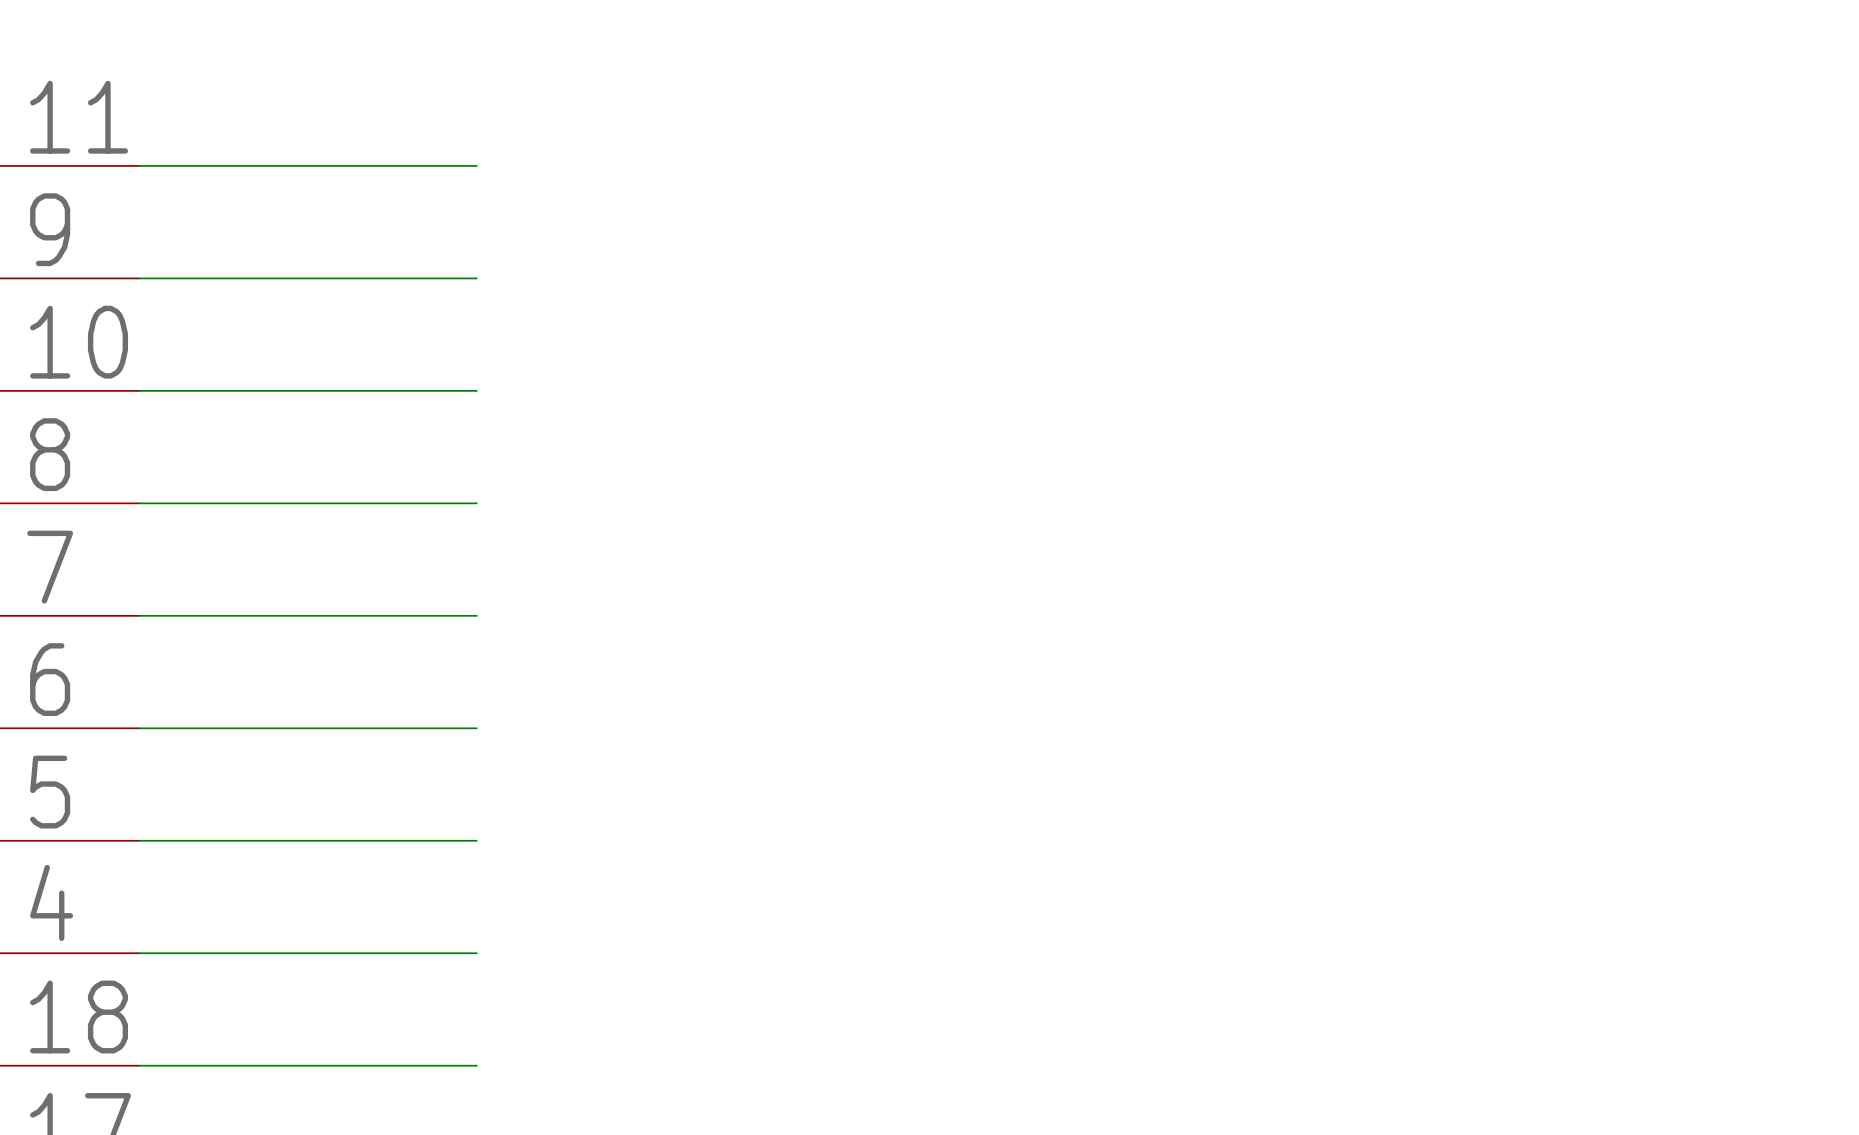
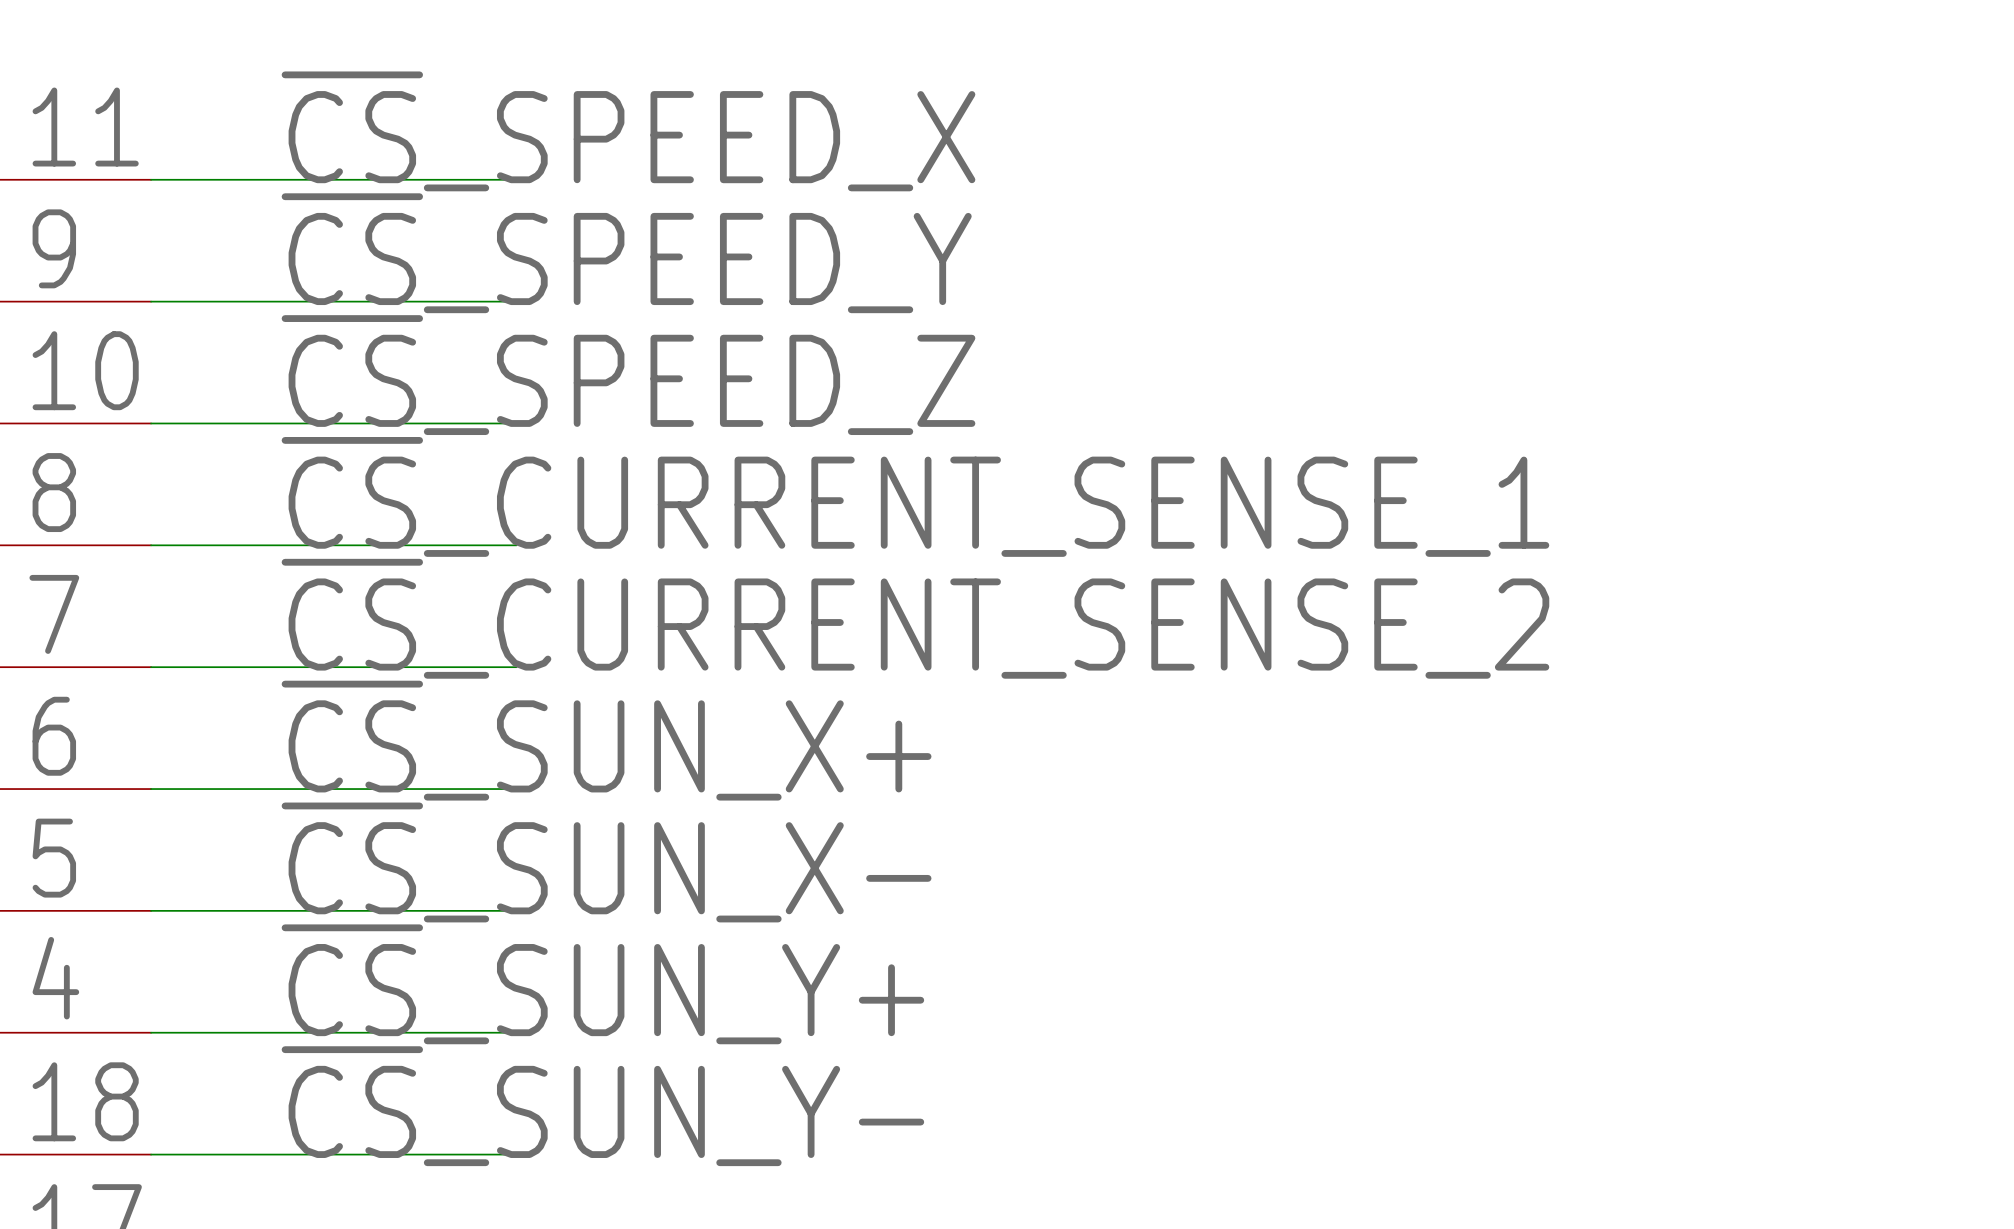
label: none -> ~{CS}_SPEED_X (628, 131)
label: none -> ~{CS}_SPEED_Y (626, 253)
label: none -> ~{CS}_SPEED_Z (628, 375)
label: none -> ~{CS}_CURRENT_SENSE_1 (915, 496)
label: none -> ~{CS}_CURRENT_SENSE_2 (915, 618)
label: none -> ~{CS}_SUN_X+ (606, 740)
label: none -> ~{CS}_SUN_X- (606, 862)
label: none -> ~{CS}_SUN_Y+ (602, 984)
label: none -> ~{CS}_SUN_Y- (602, 1106)

